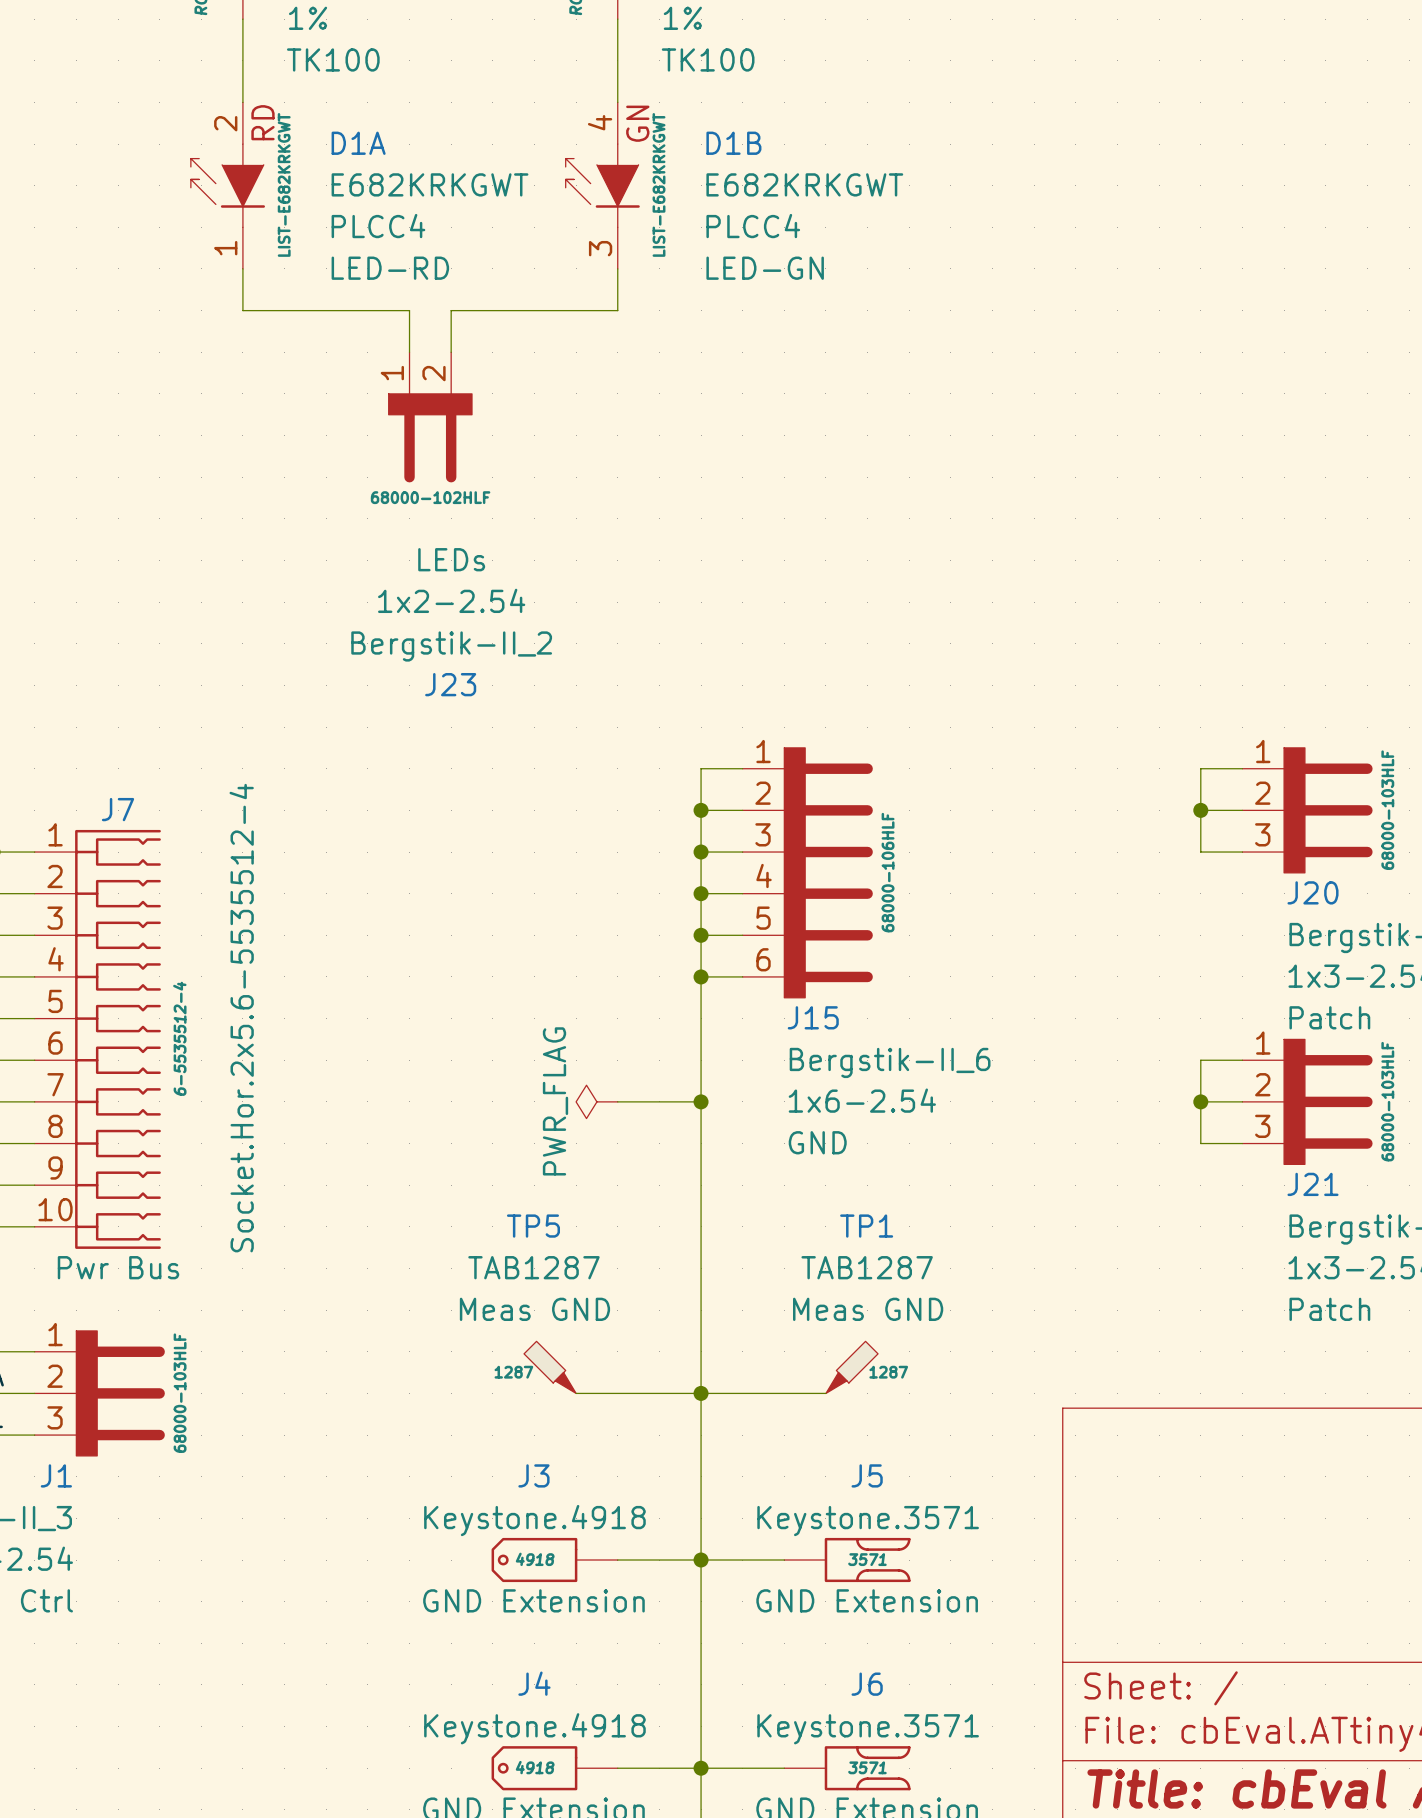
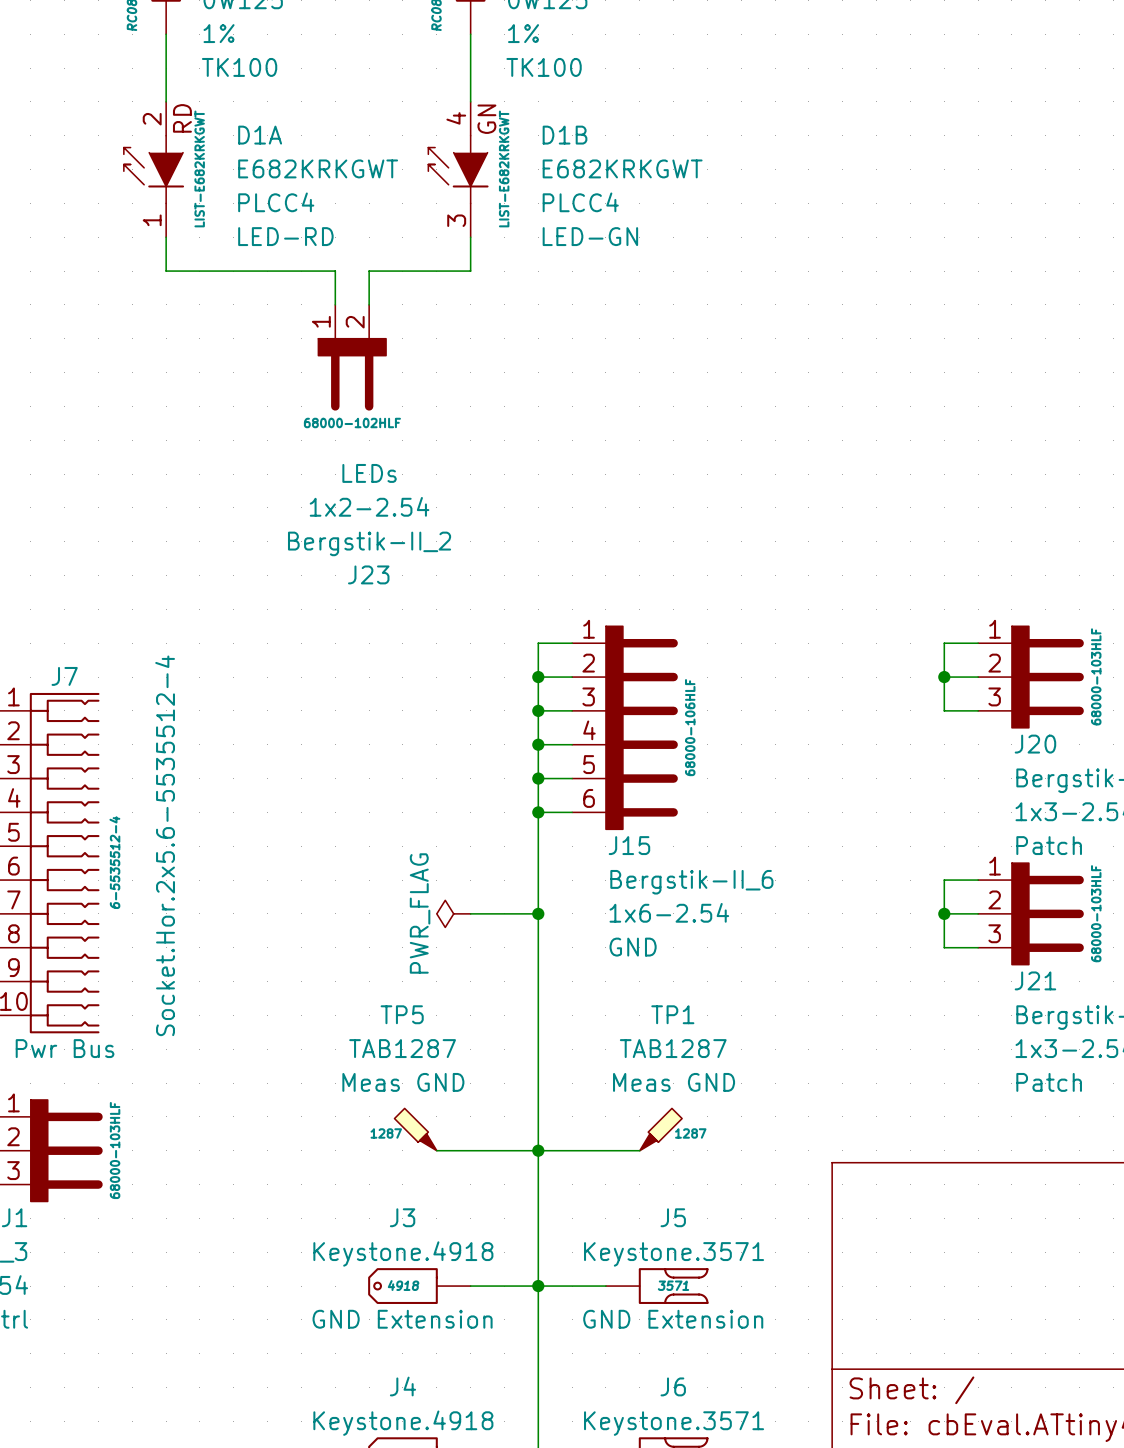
wire: (409, 310) (409, 352) -> (301, 271) (335, 271)
wire: (451, 310) (492, 310) -> (369, 304) (369, 271)
J23 position: (430, 417) -> (352, 357)

